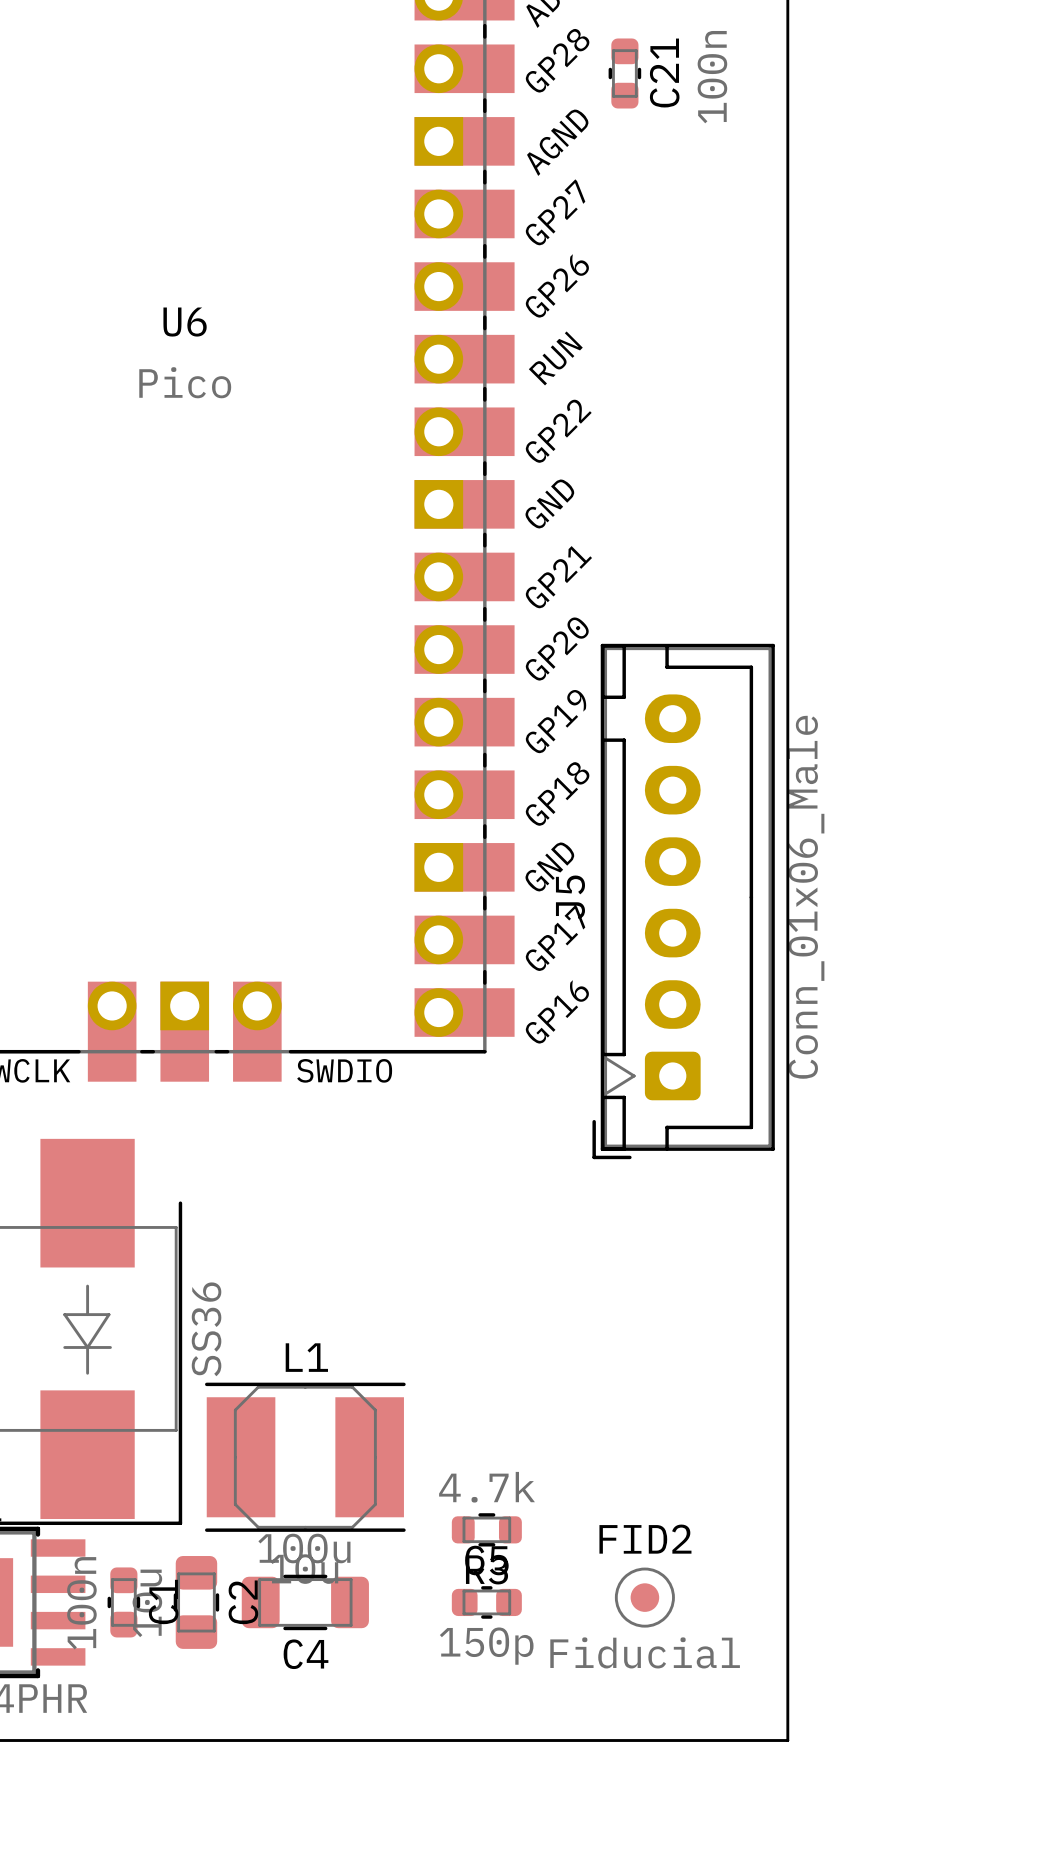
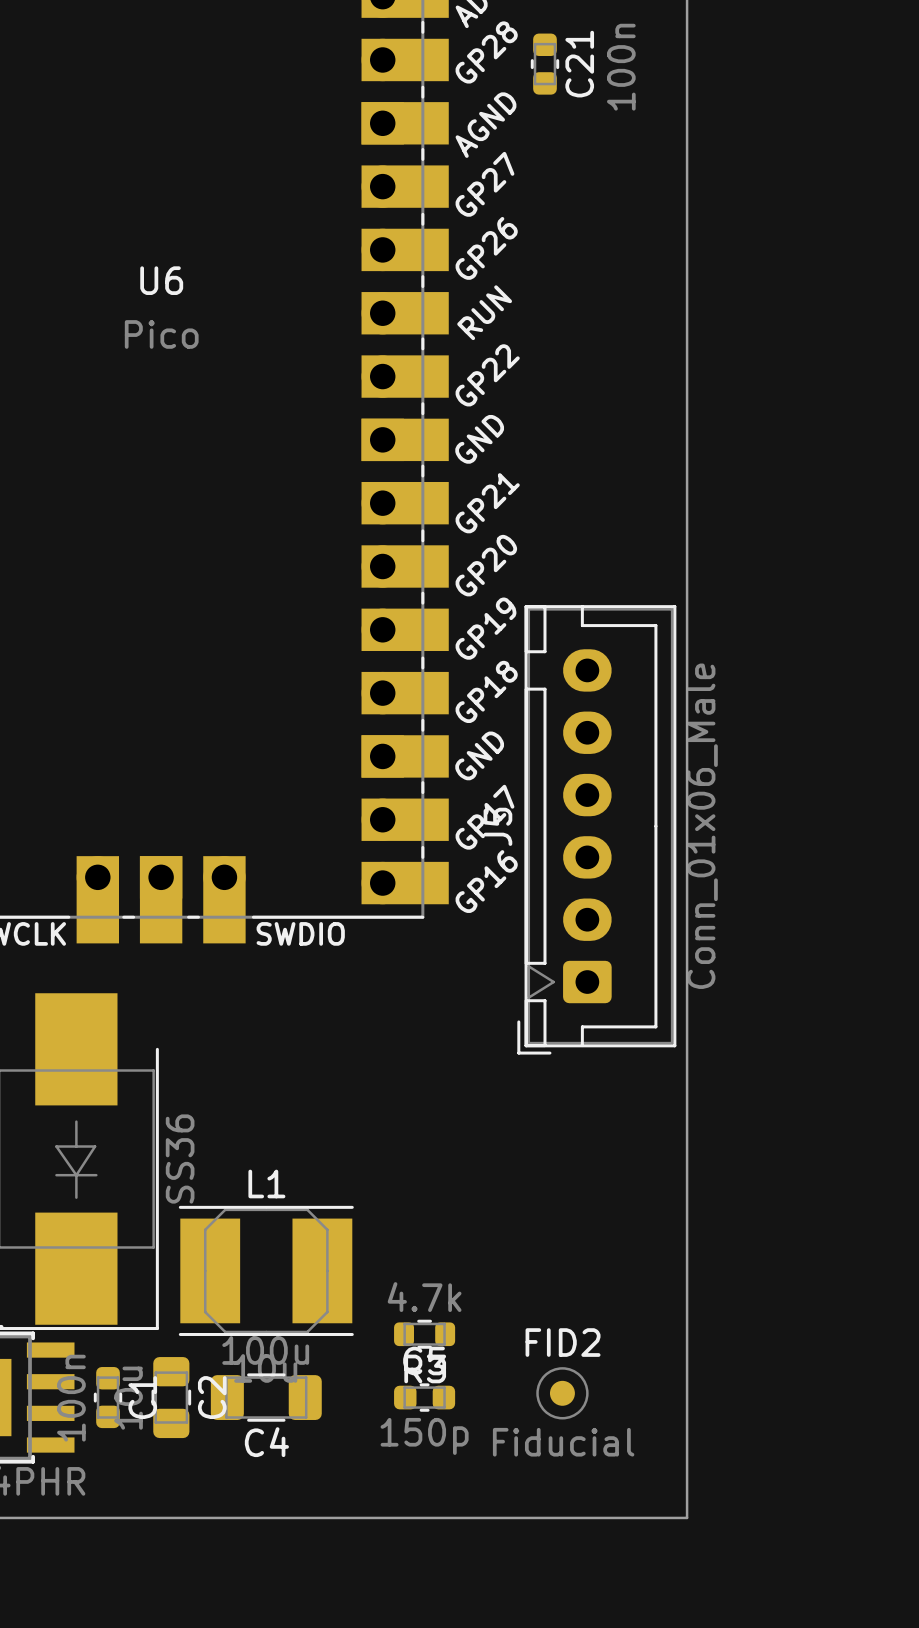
J5 position: (683, 901) -> (596, 829)

